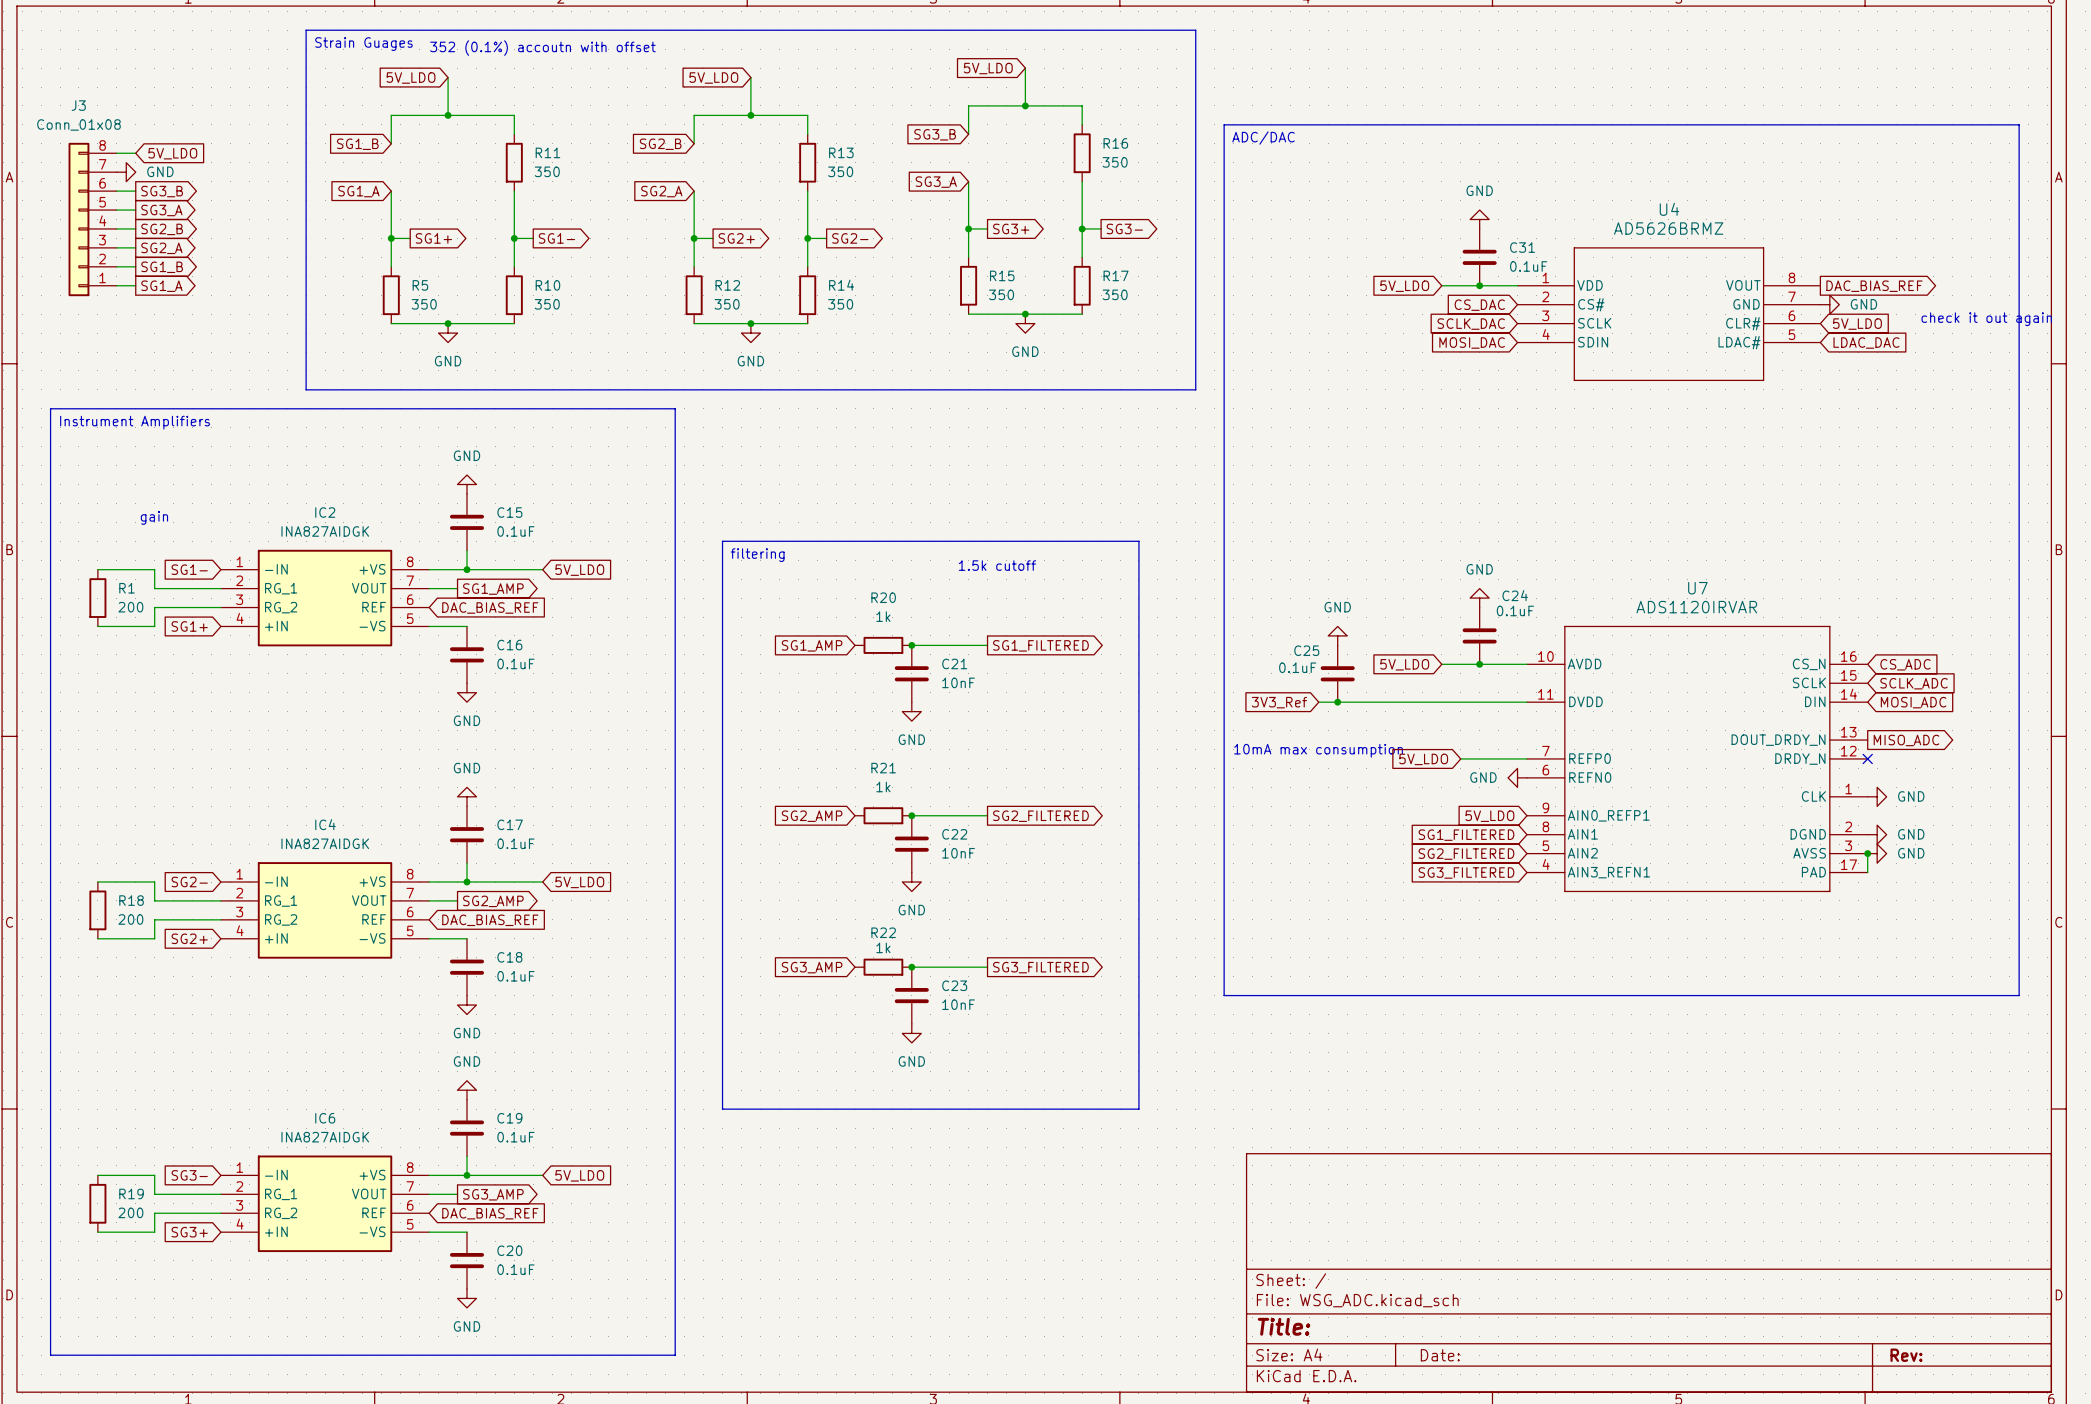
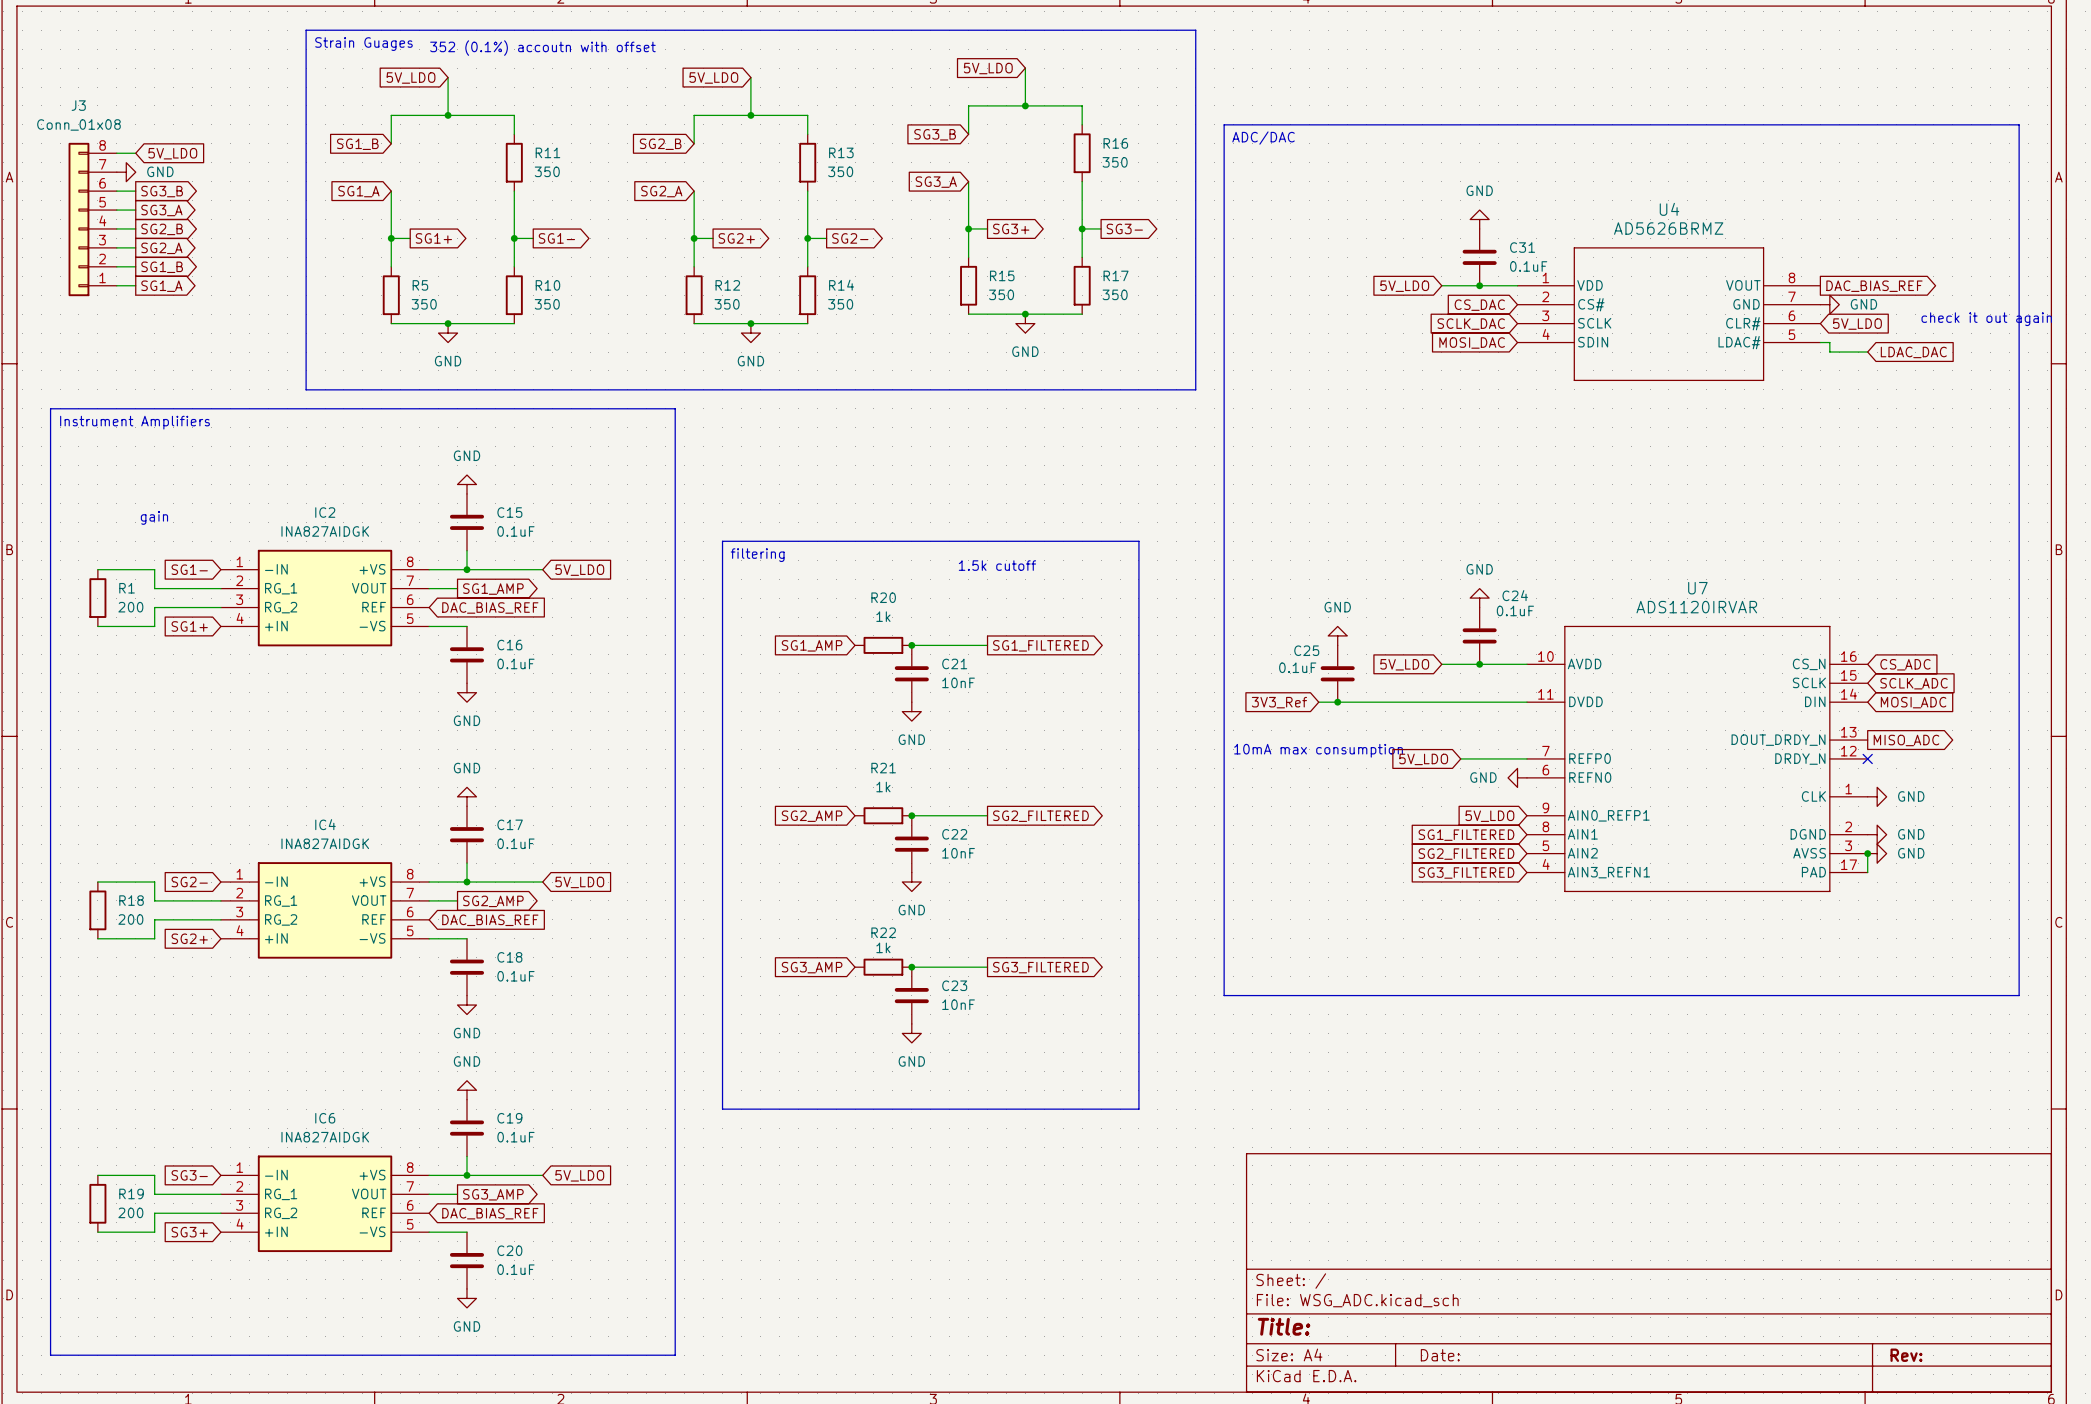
wire: none -> (1820, 342) (1829, 342) (1829, 352) (1867, 352)
global label position: LDAC_DAC (1866, 342) -> LDAC_DAC (1913, 352)

